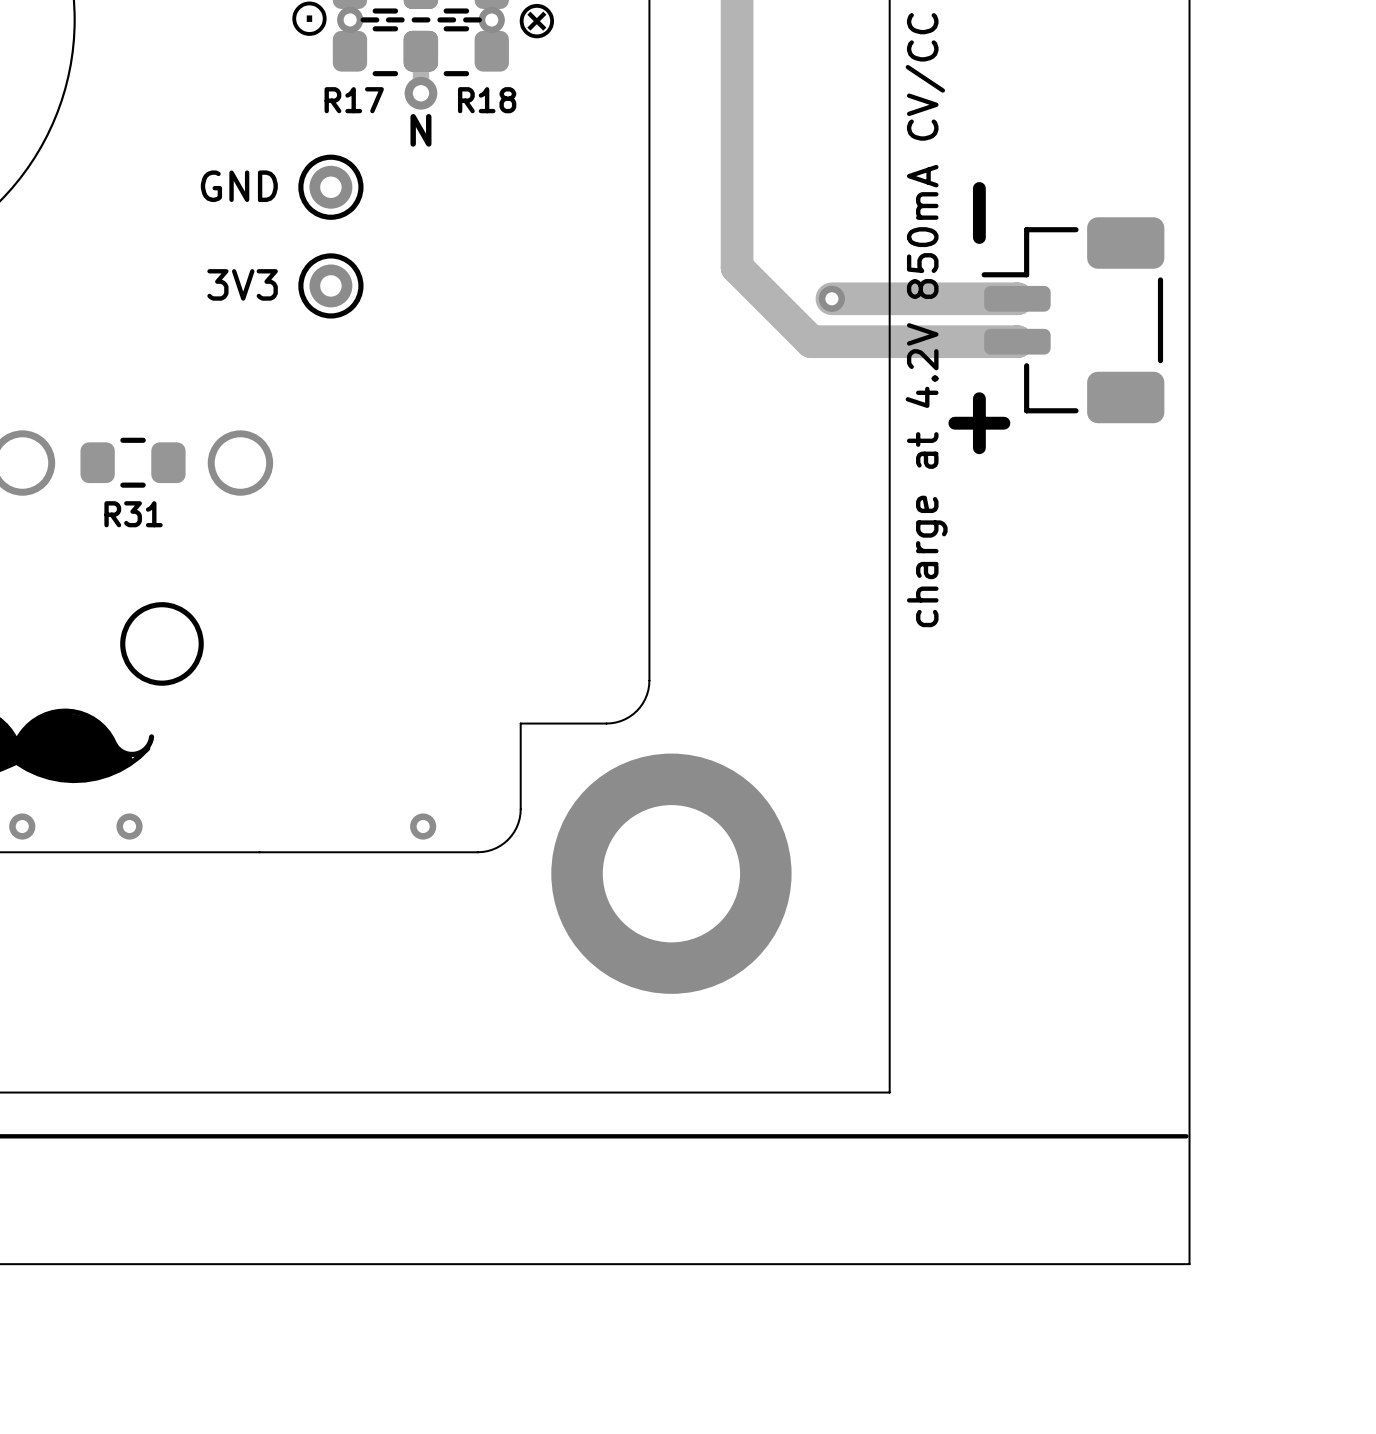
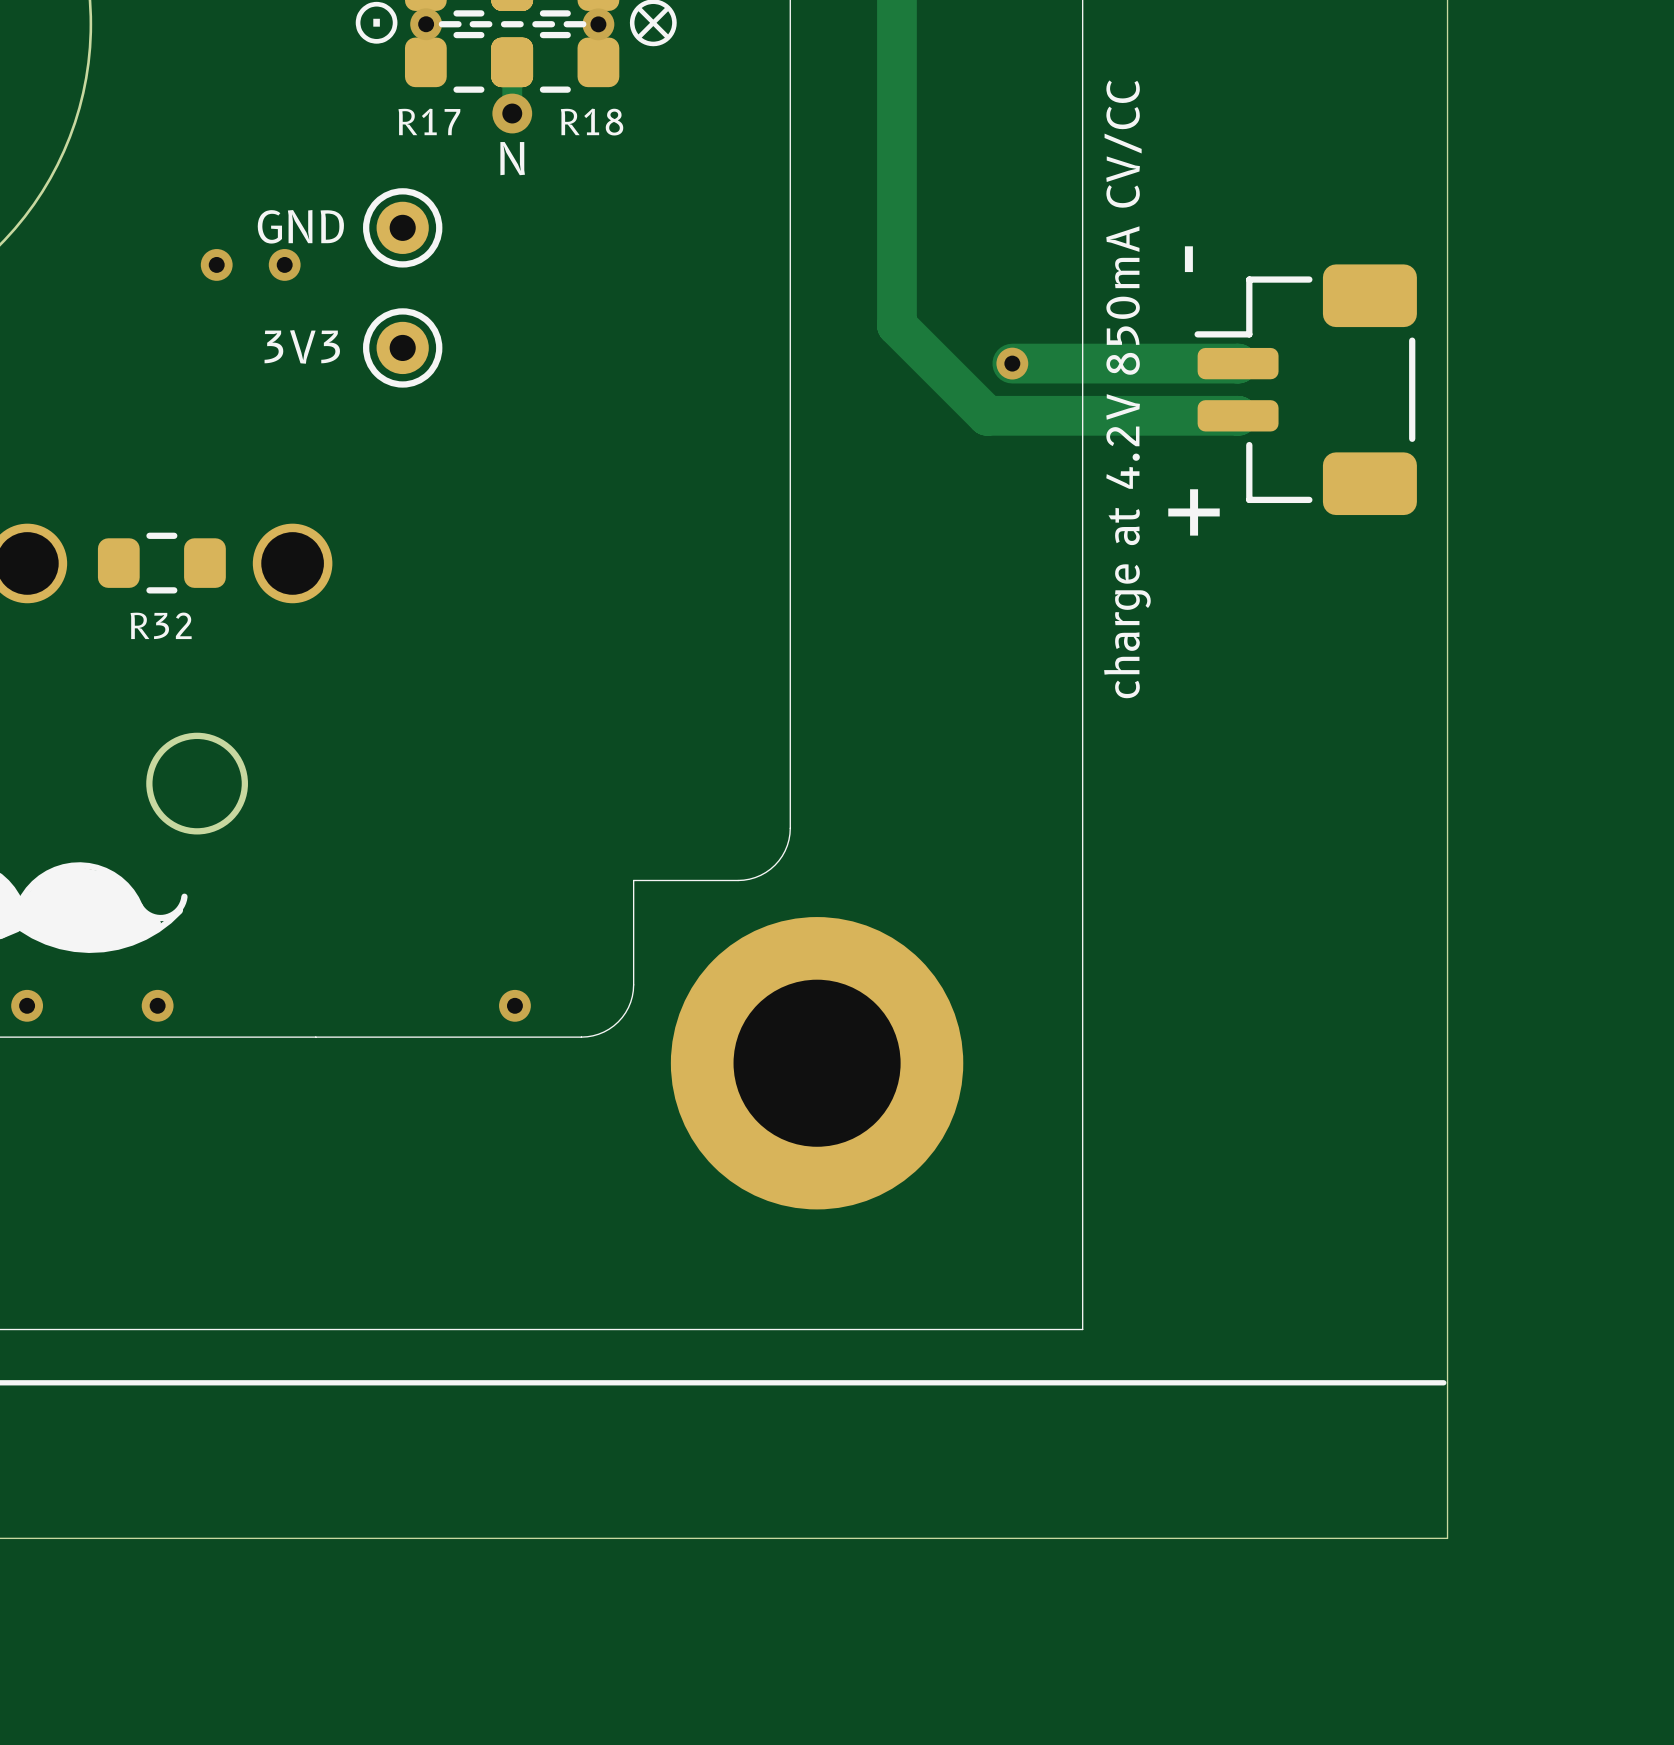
via: none -> (216, 264)
via: none -> (284, 264)
R31 name: R31 (133, 514) -> R32 (161, 625)

